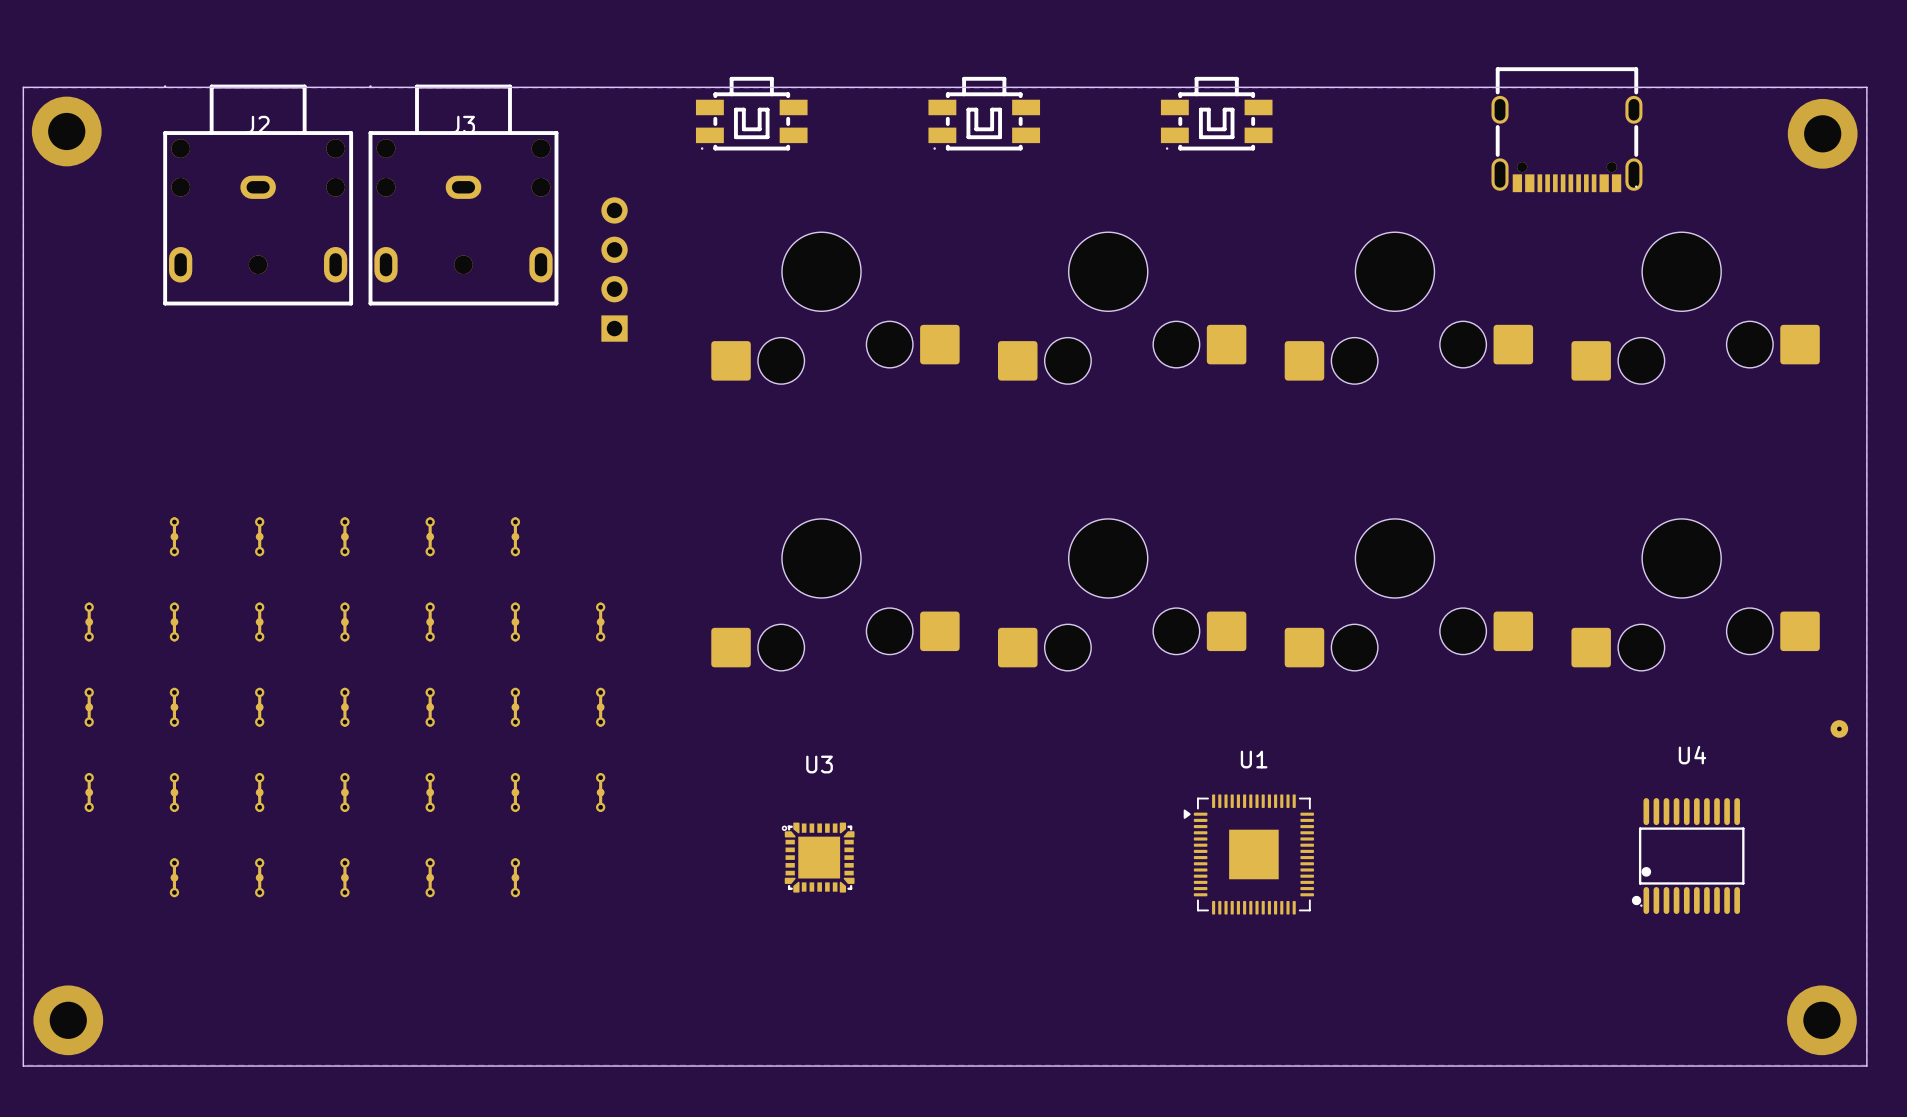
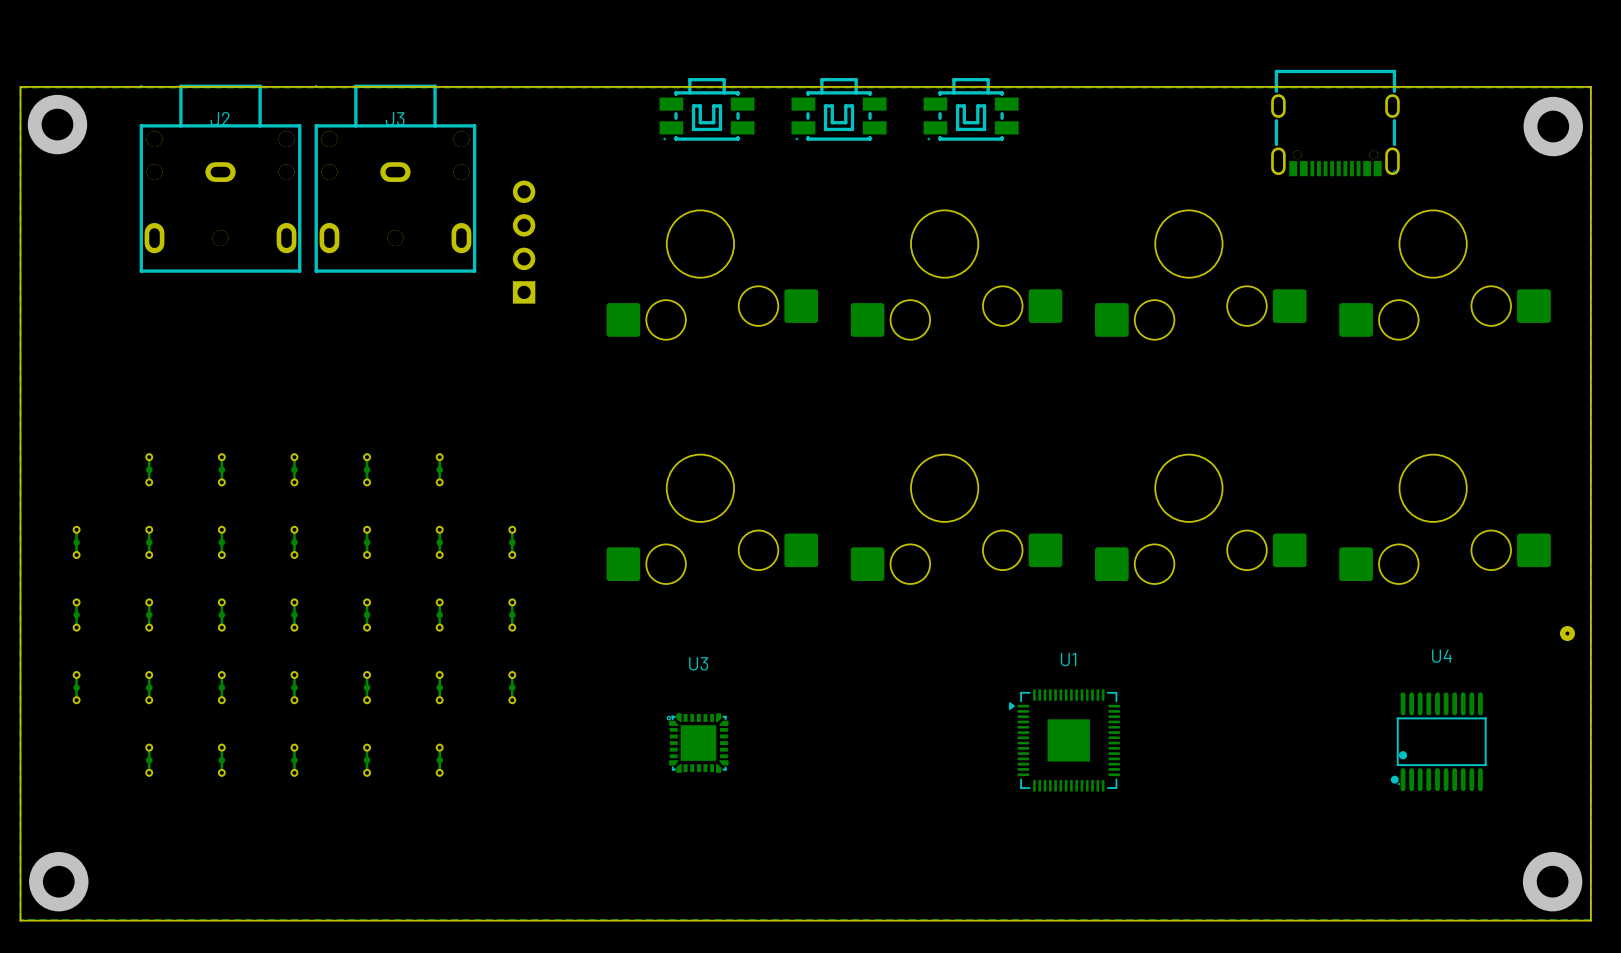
part position: (751, 113) -> (707, 109)
part position: (1216, 113) -> (971, 109)

